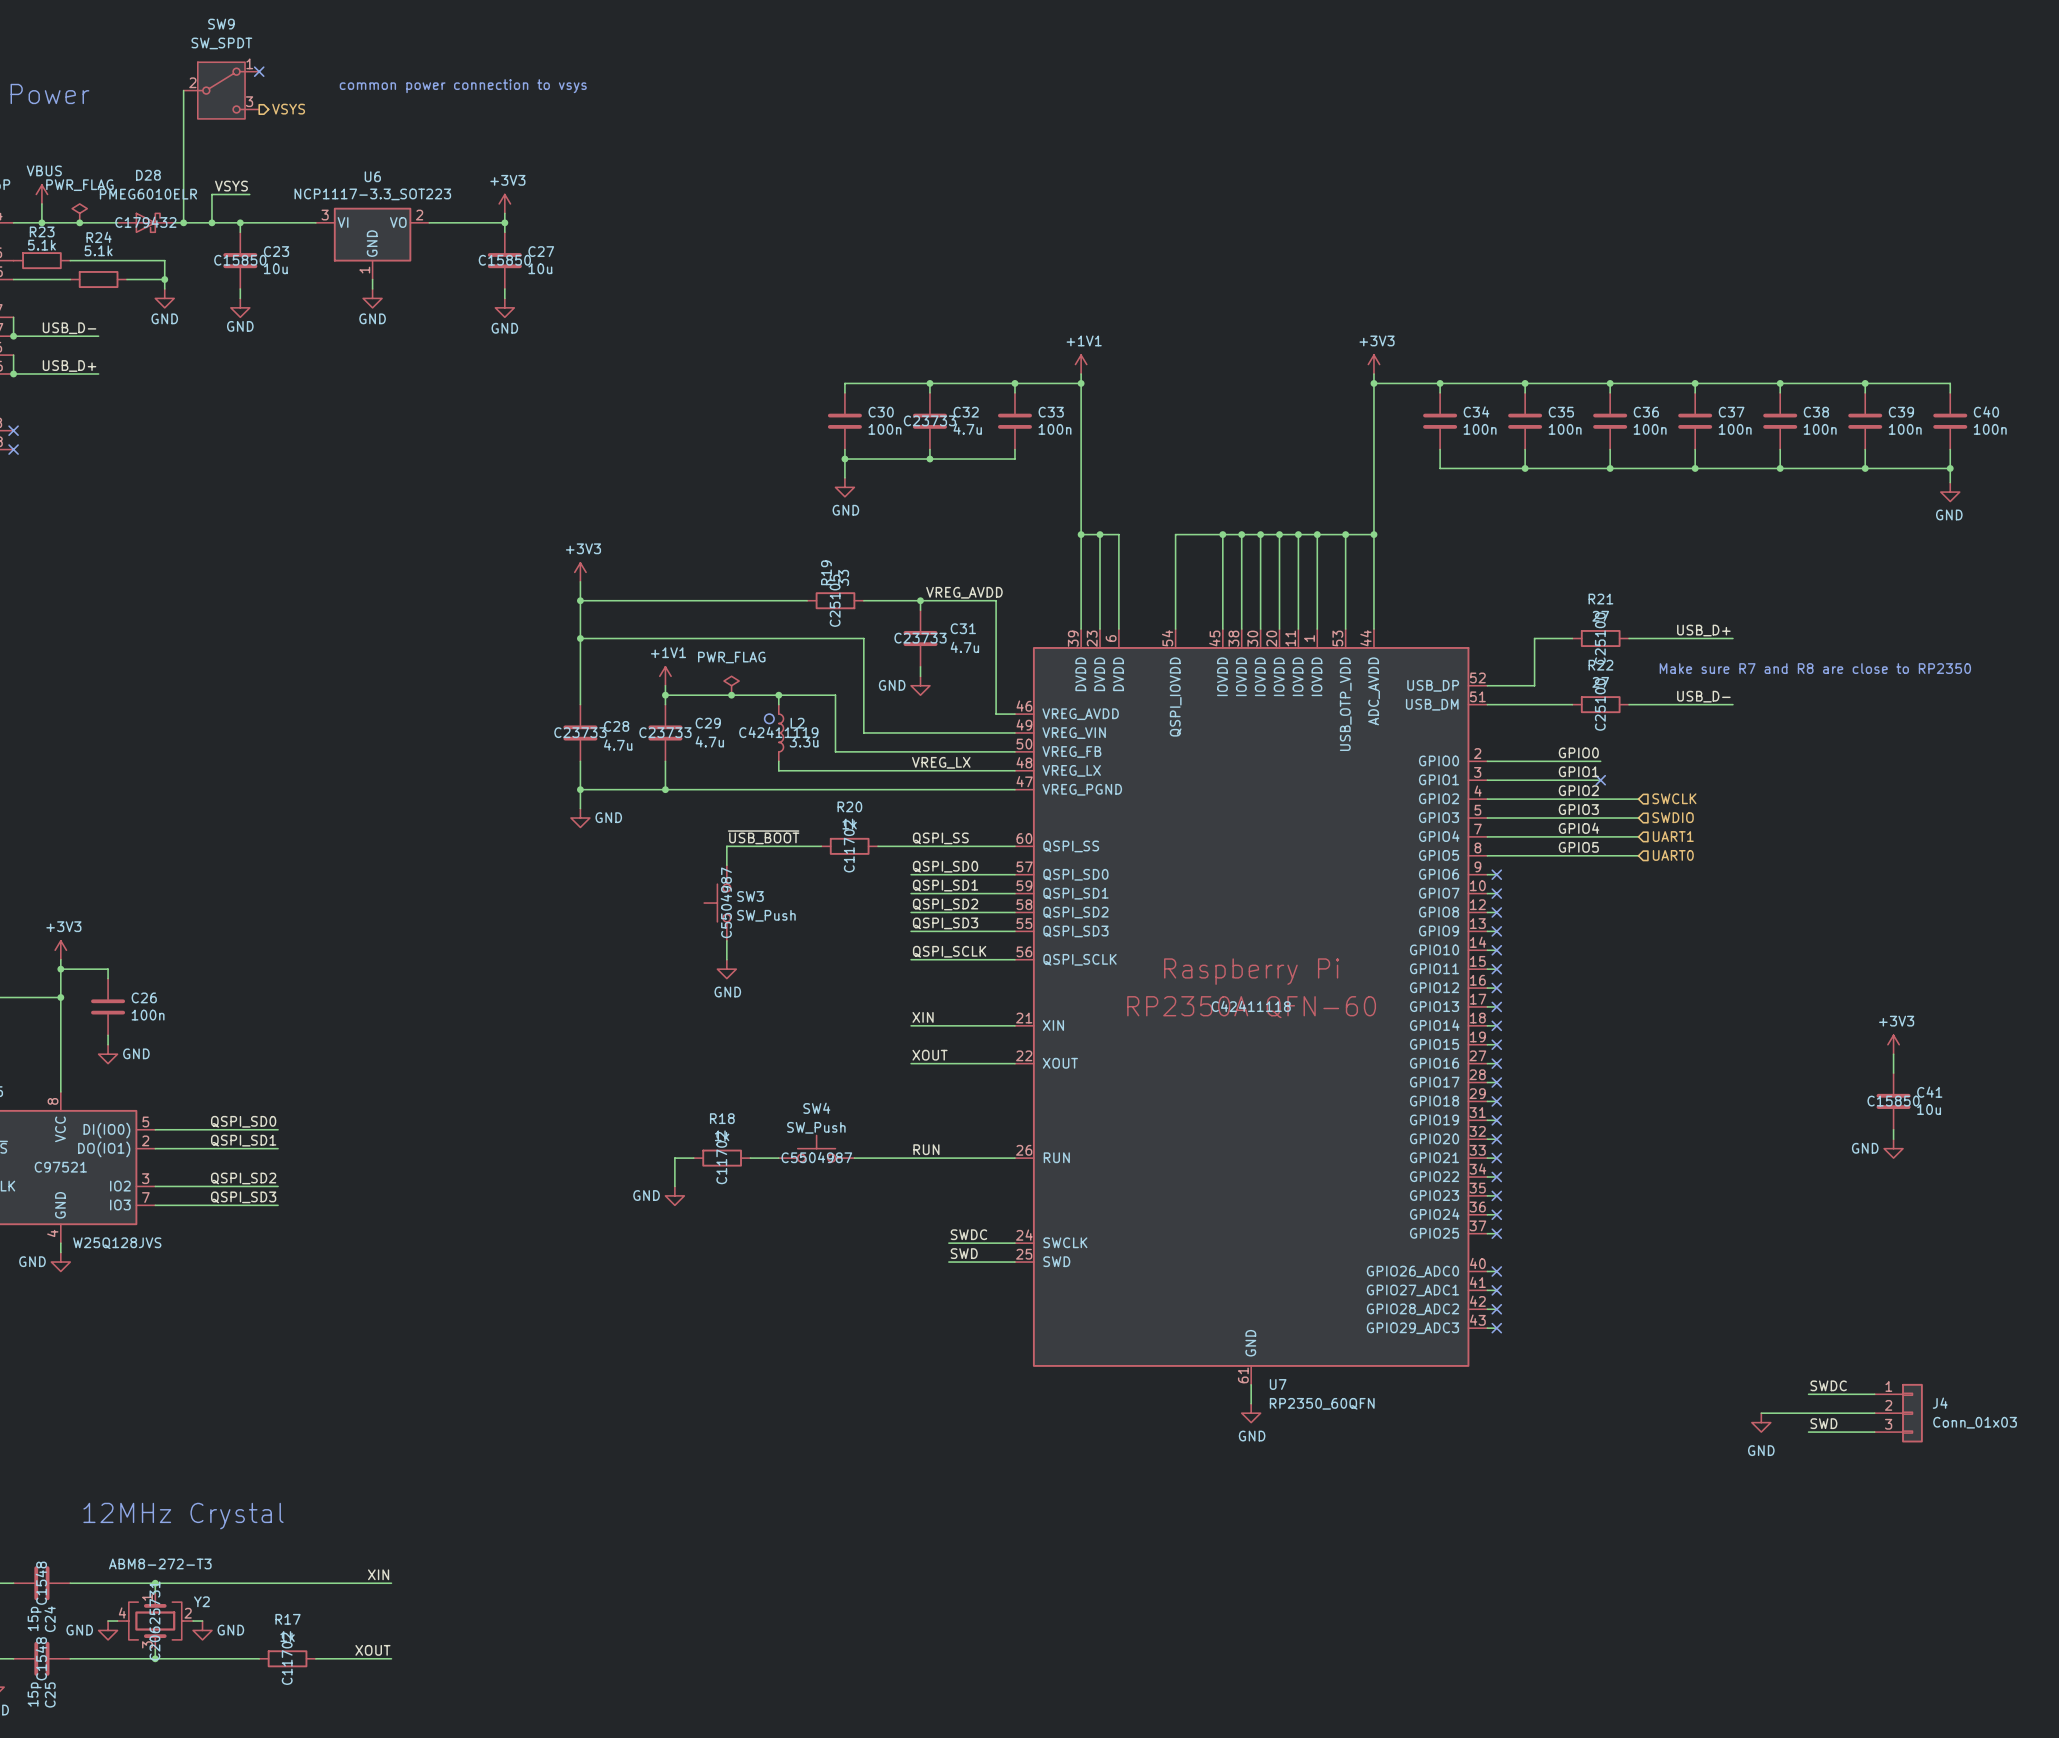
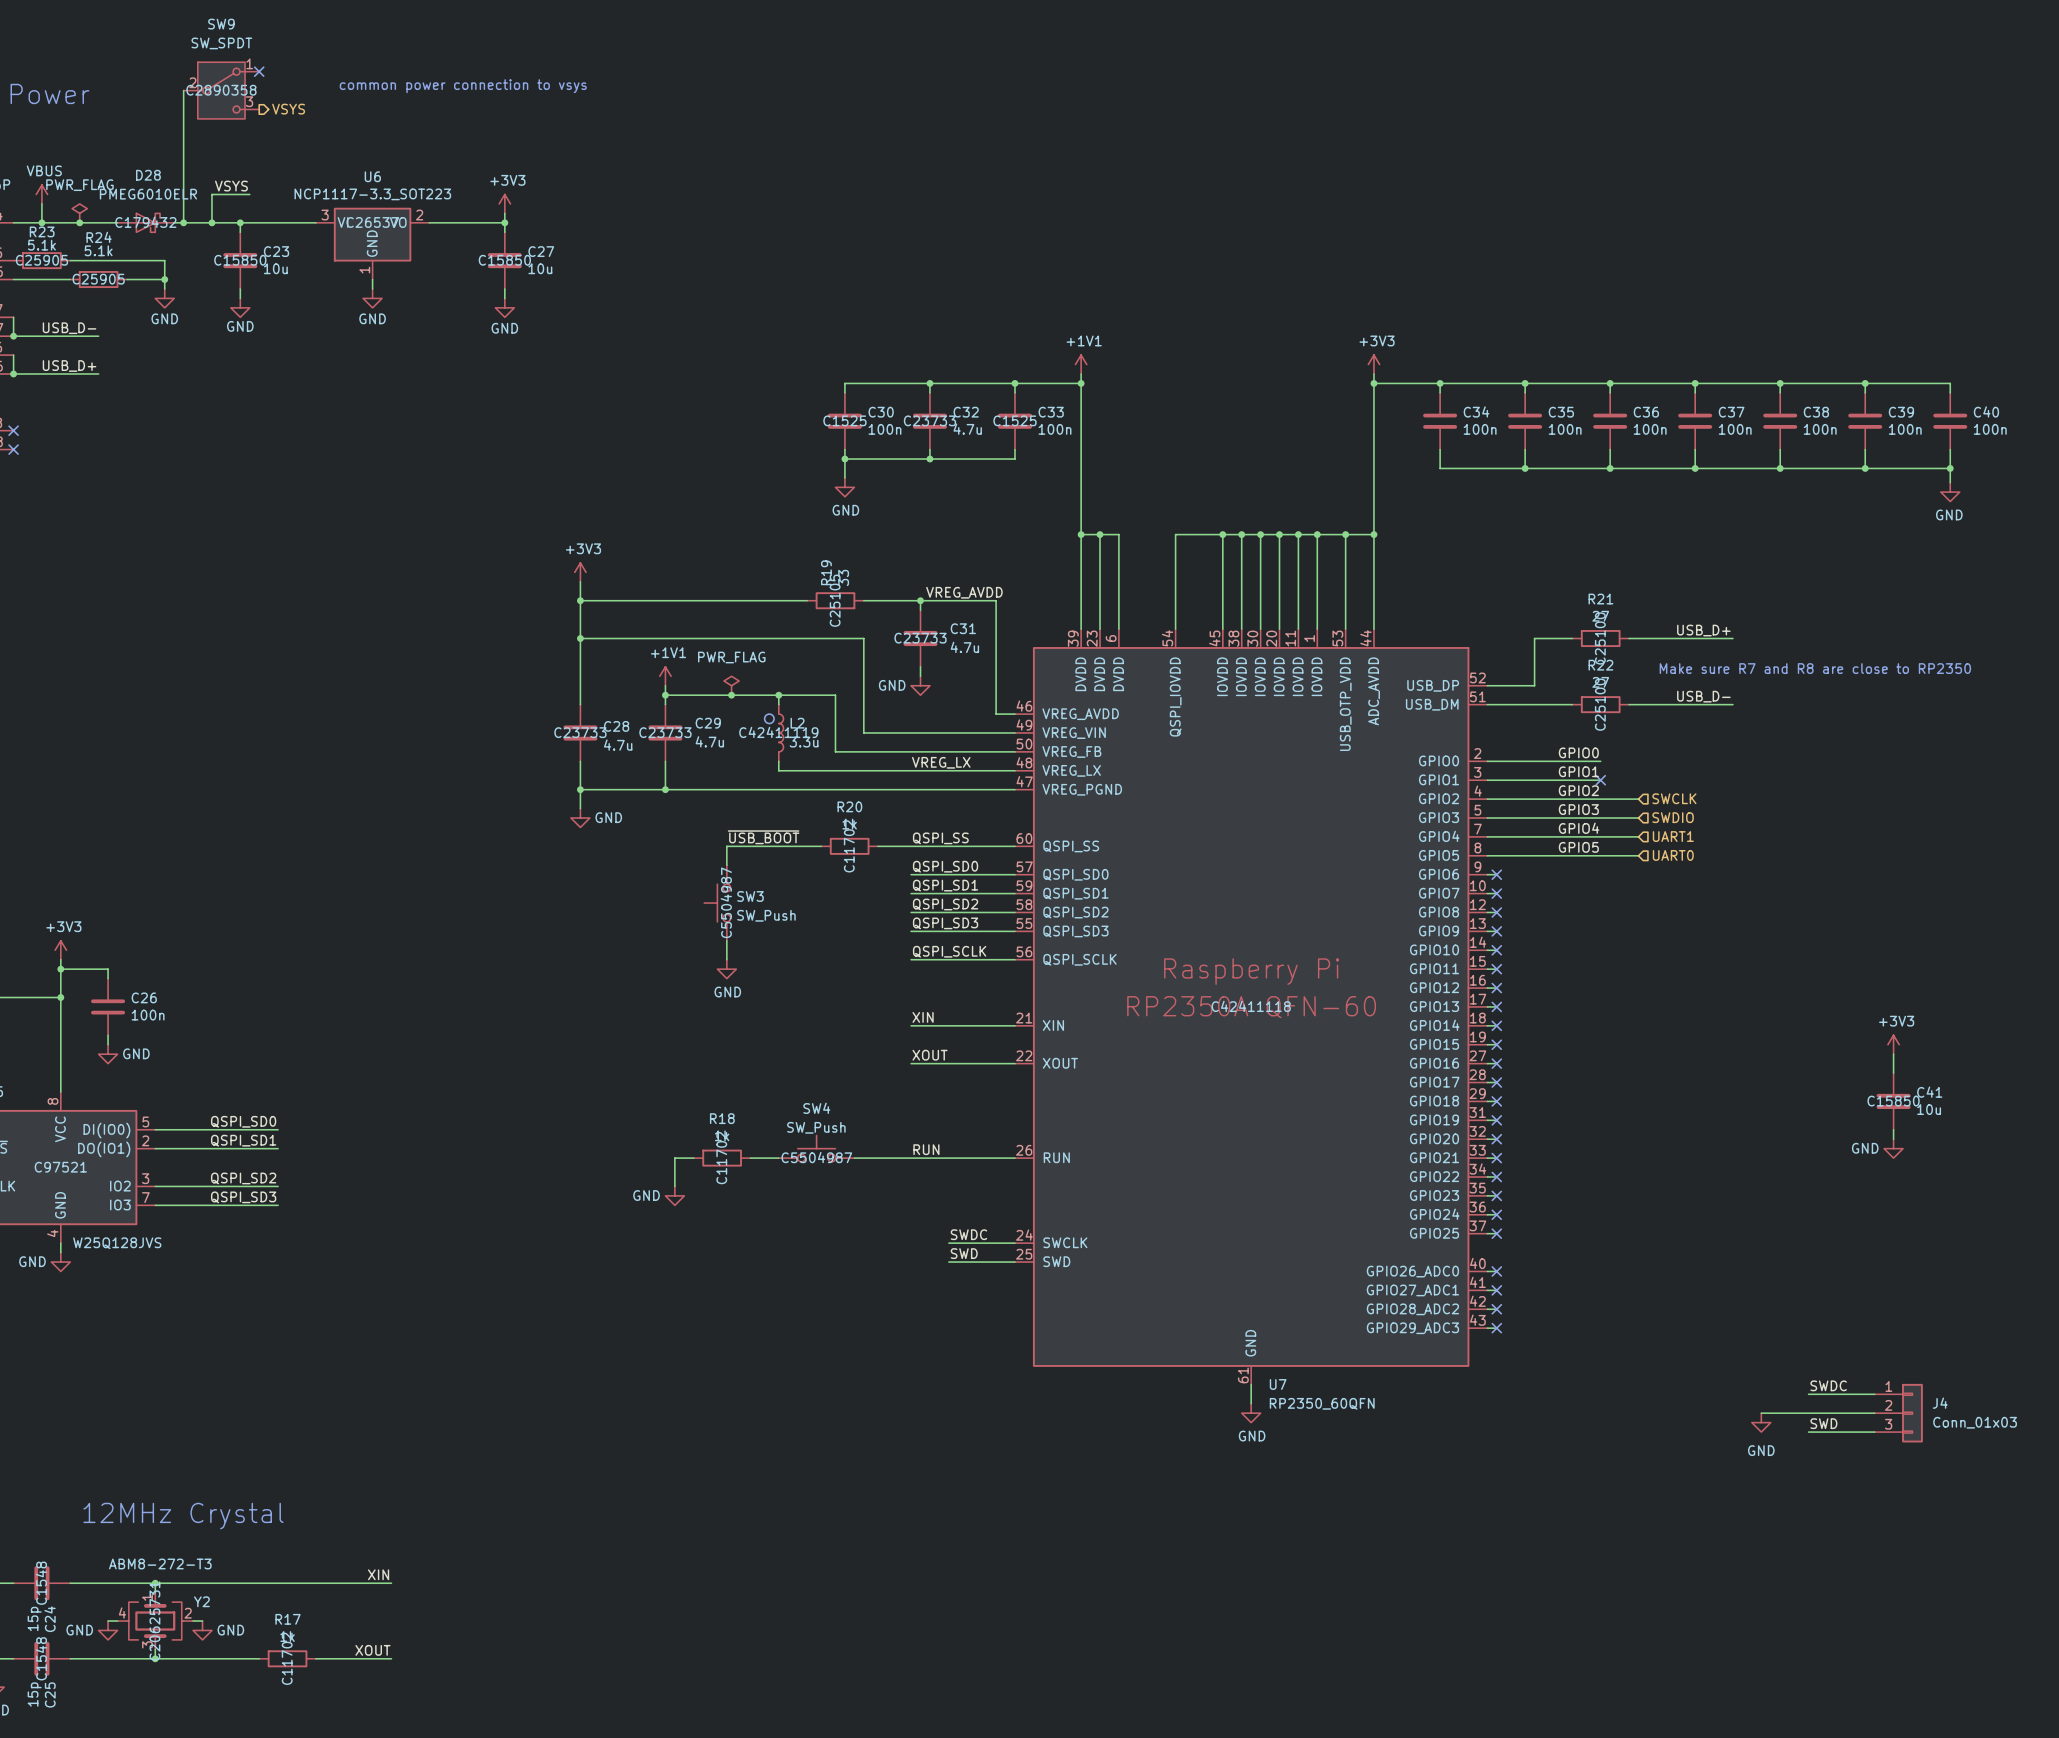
SW9 text: none -> C2890358 (221, 90)
U6 text: none -> C26537 (372, 222)
R23 text: none -> C25905 (41, 260)
R24 text: none -> C25905 (98, 279)
C30 text: none -> C1525 (844, 420)
C33 text: none -> C1525 (1014, 420)

